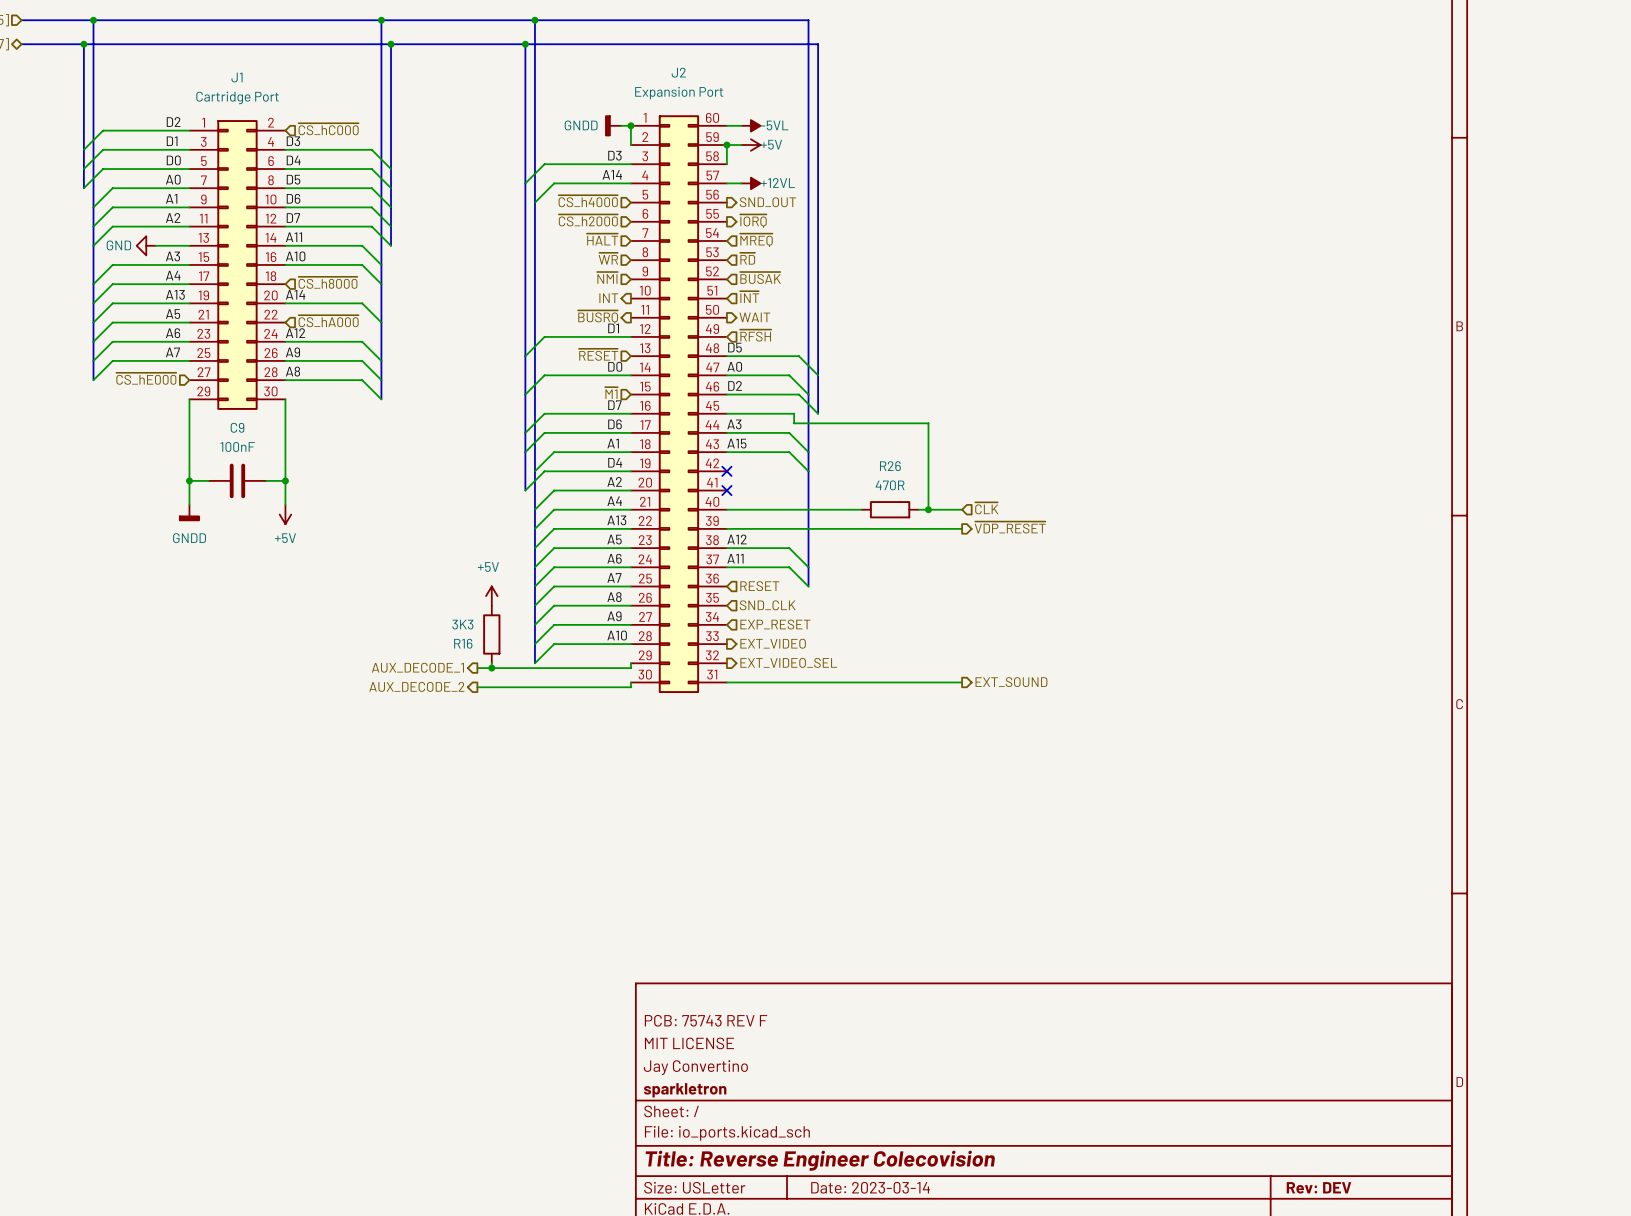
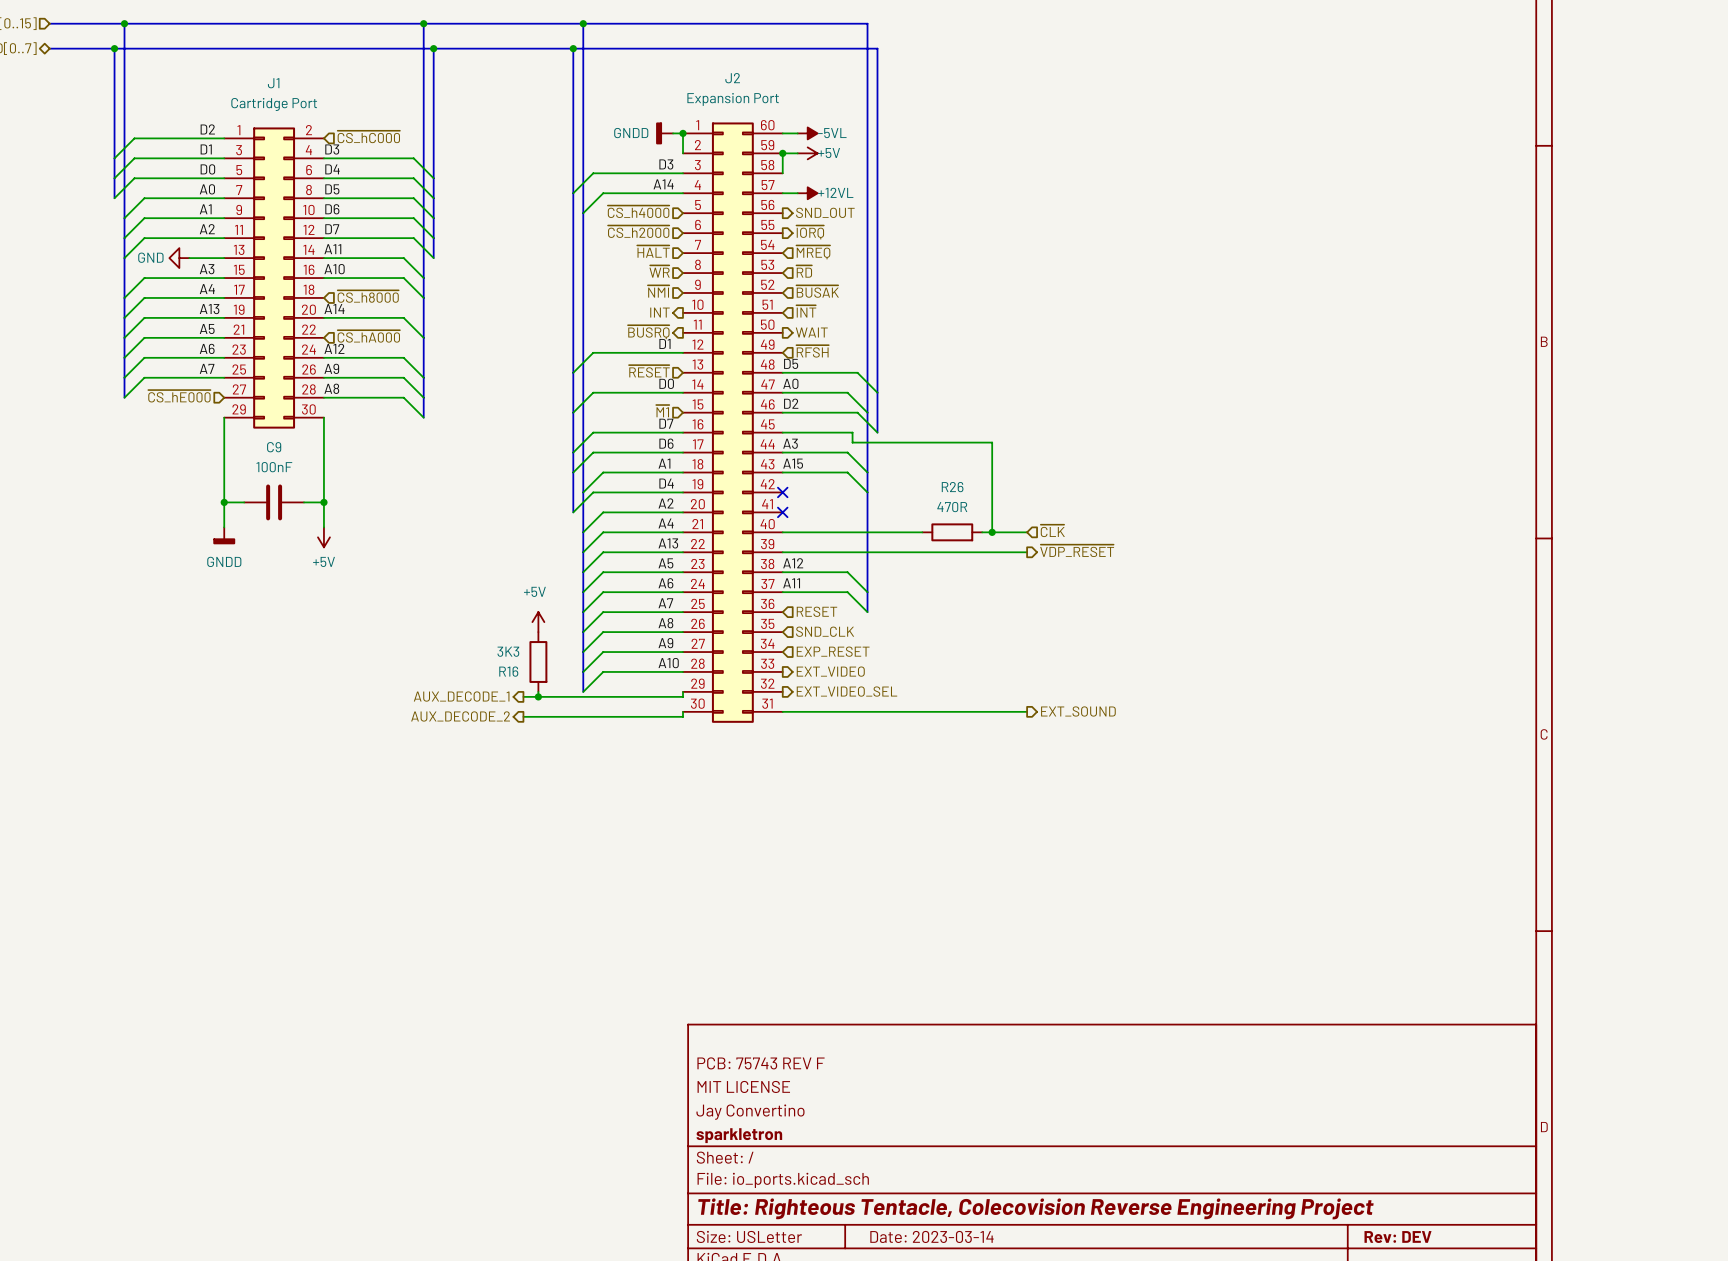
title block: Title: Reverse Engineer Colecovision (820, 1160) -> Title: Righteous Tentacle, Colecovision Reverse Engineering Project (1035, 1208)

